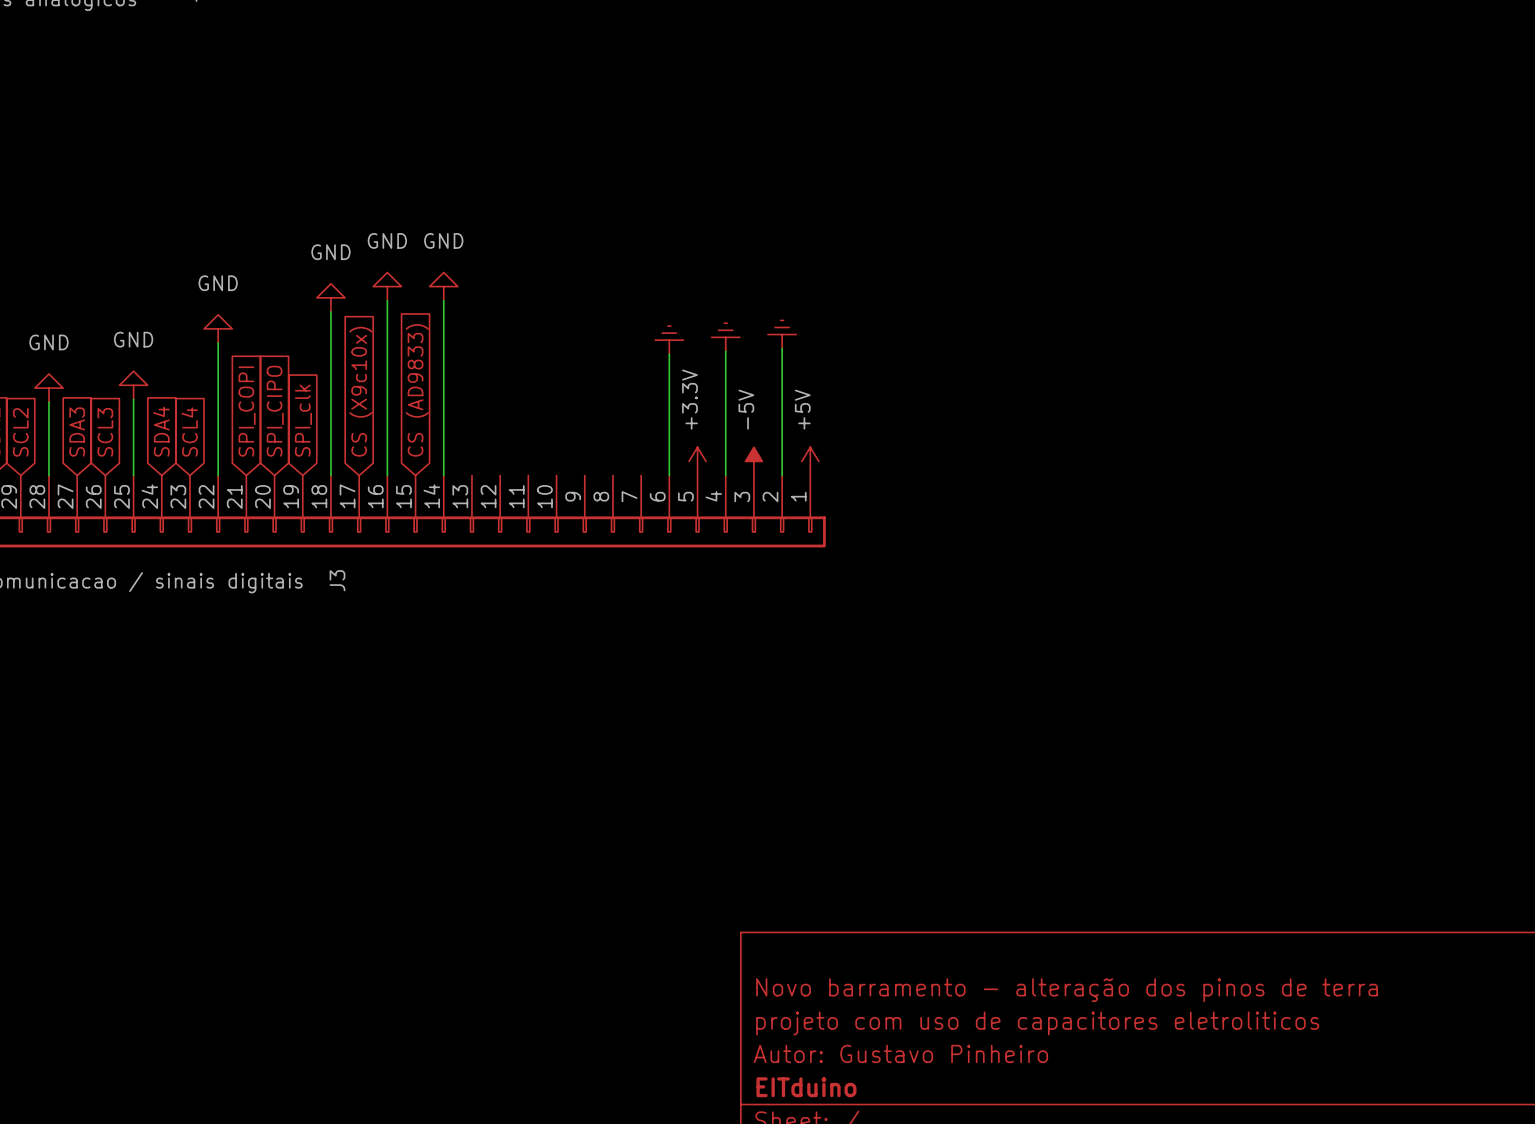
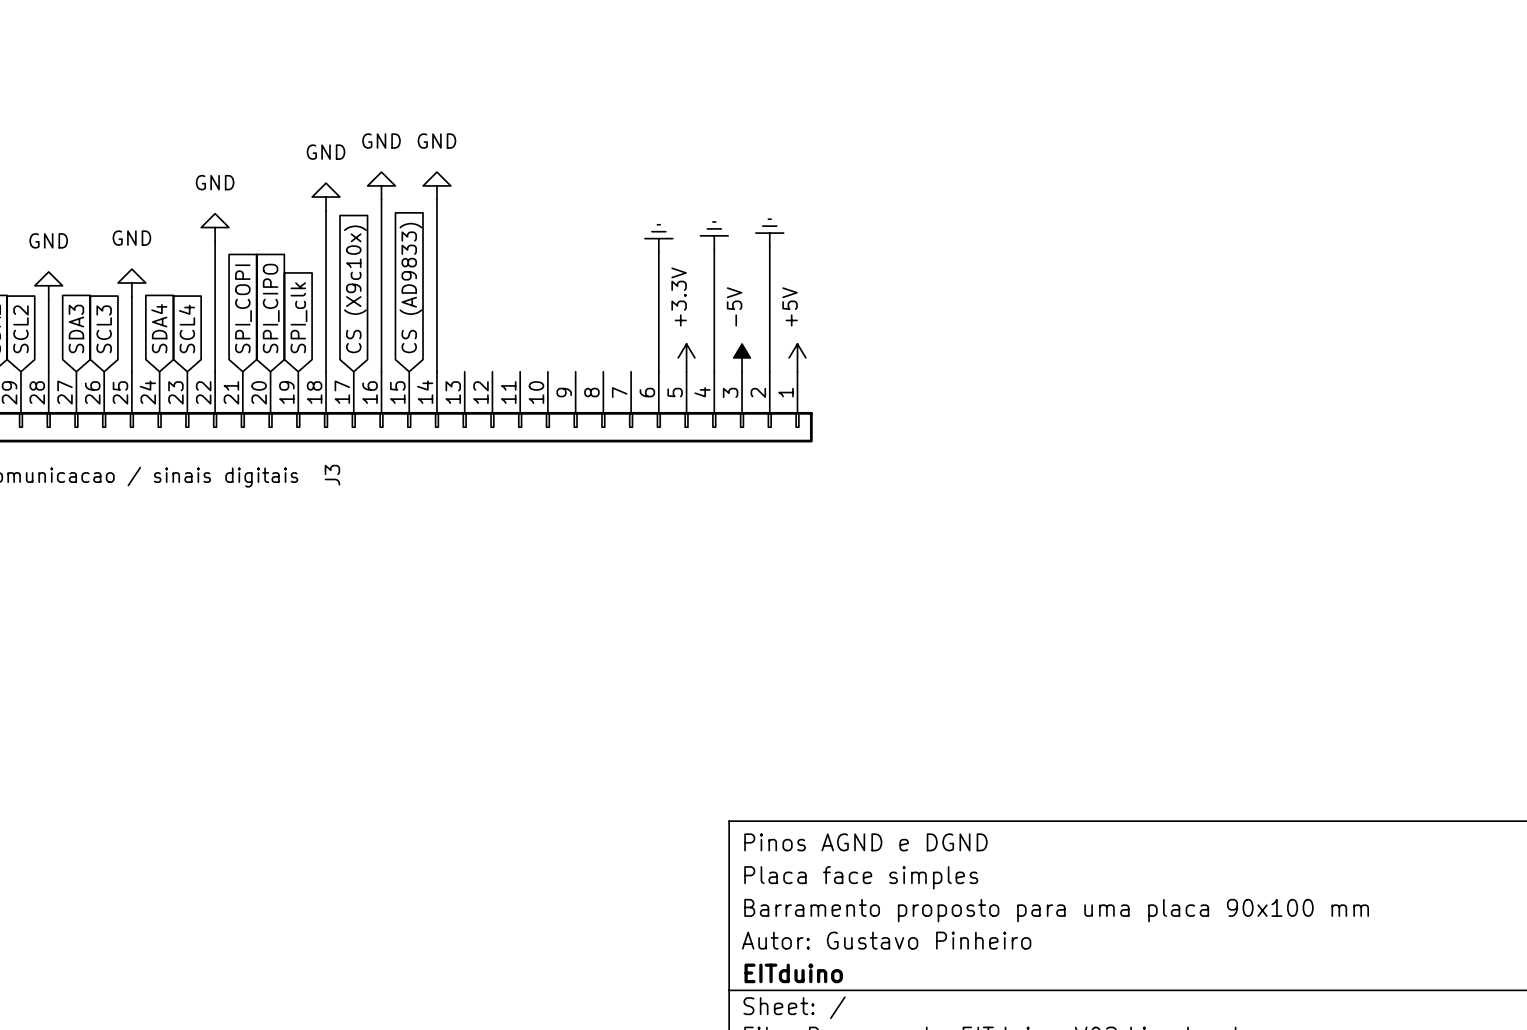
title block: none -> Pinos AGND e DGND (865, 842)
title block: Novo barramento - alteração dos pinos de terra (1067, 990) -> Placa face simples (861, 877)
title block: projeto com uso de capacitores eletroliticos (1037, 1023) -> Barramento proposto para uma placa 90x100 mm (1056, 910)

